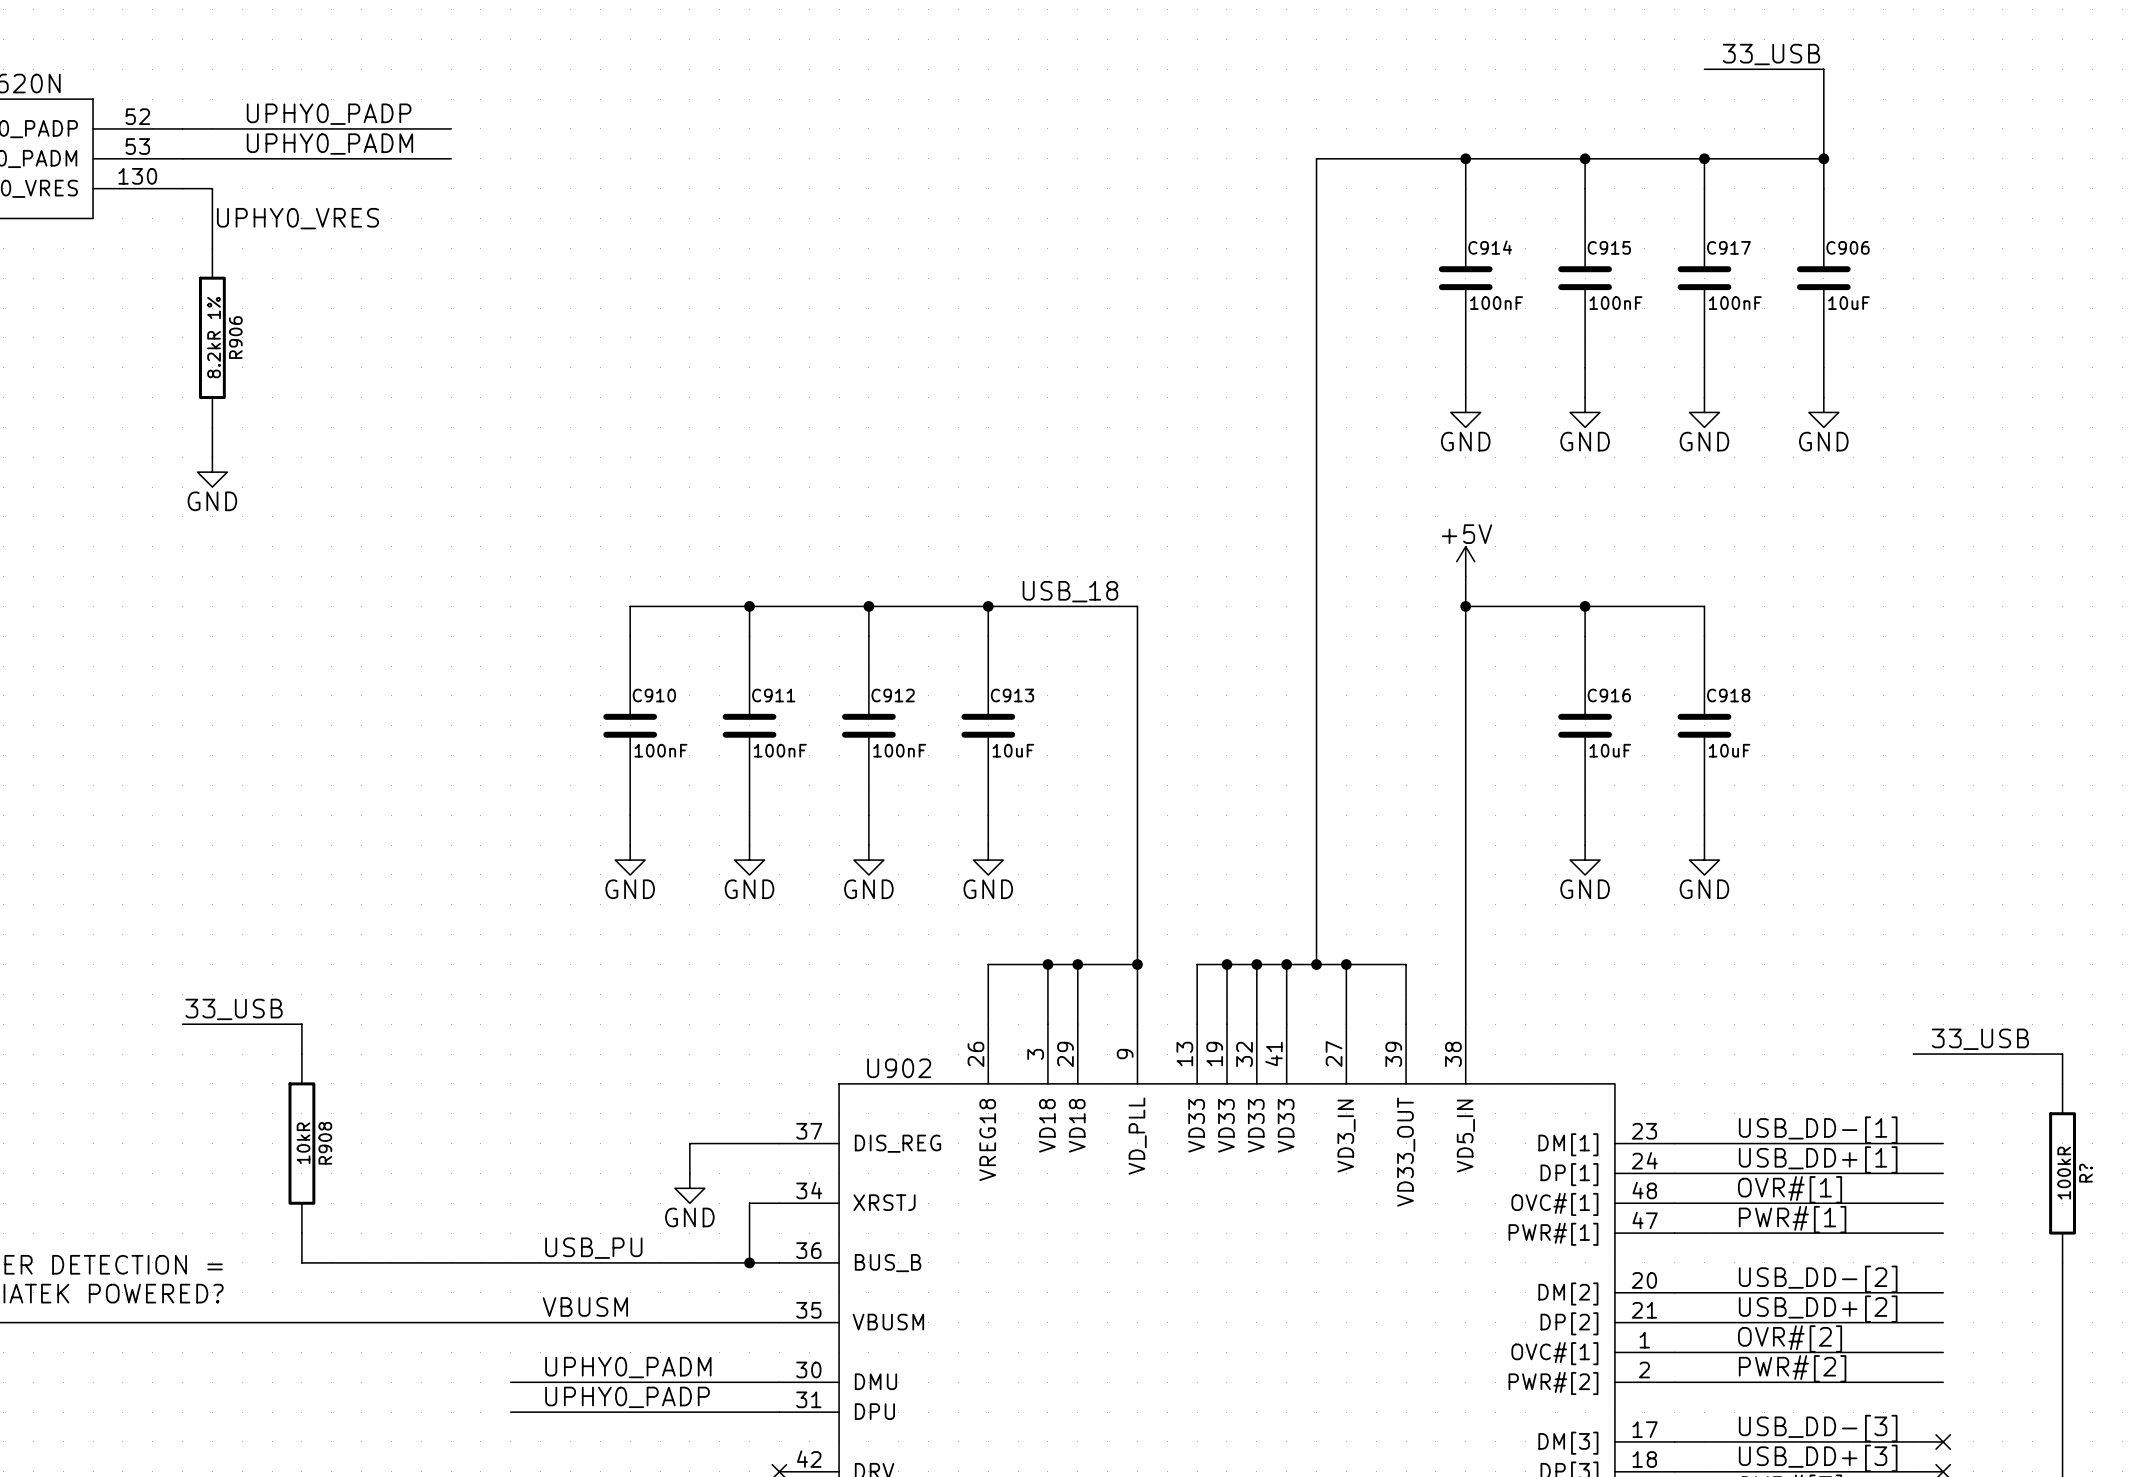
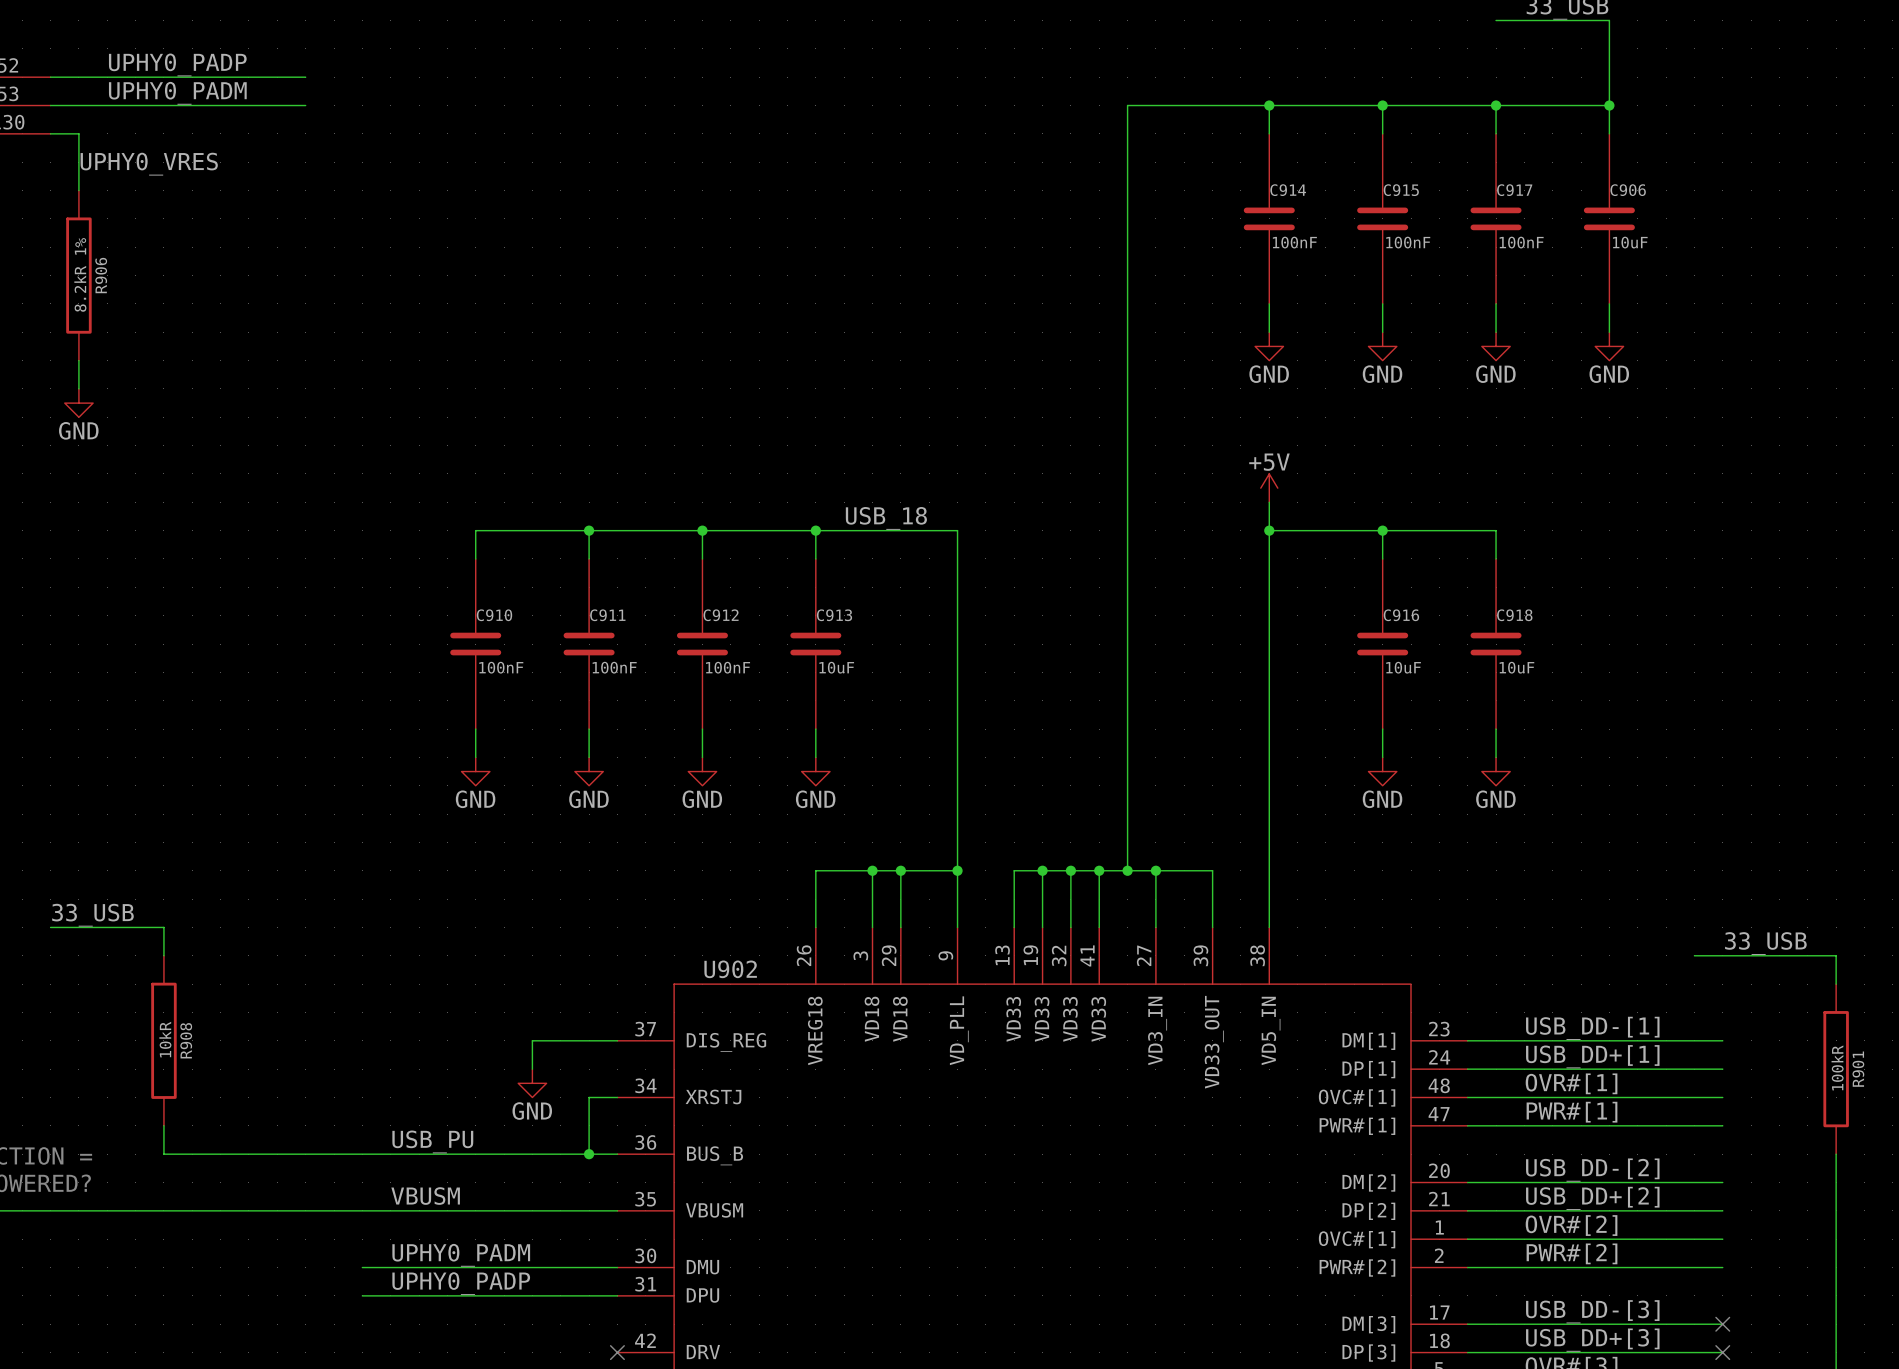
R? name: R? (2085, 1173) -> R901 (1858, 1069)

